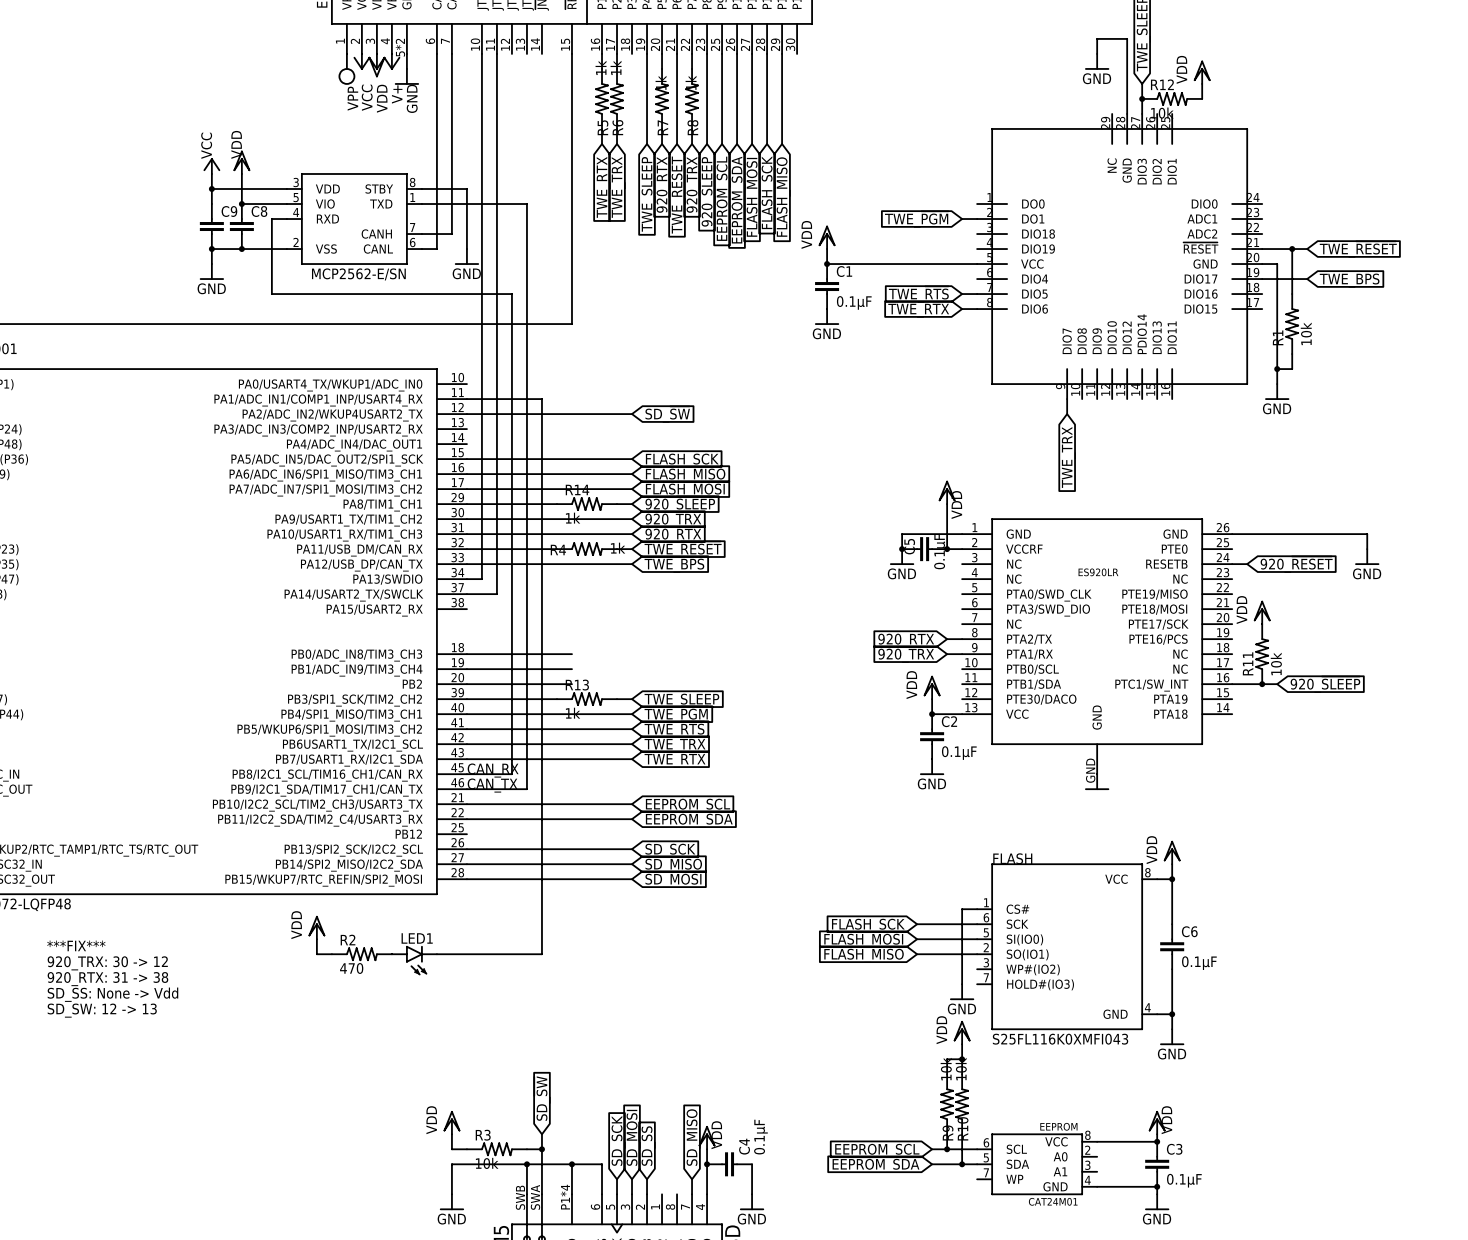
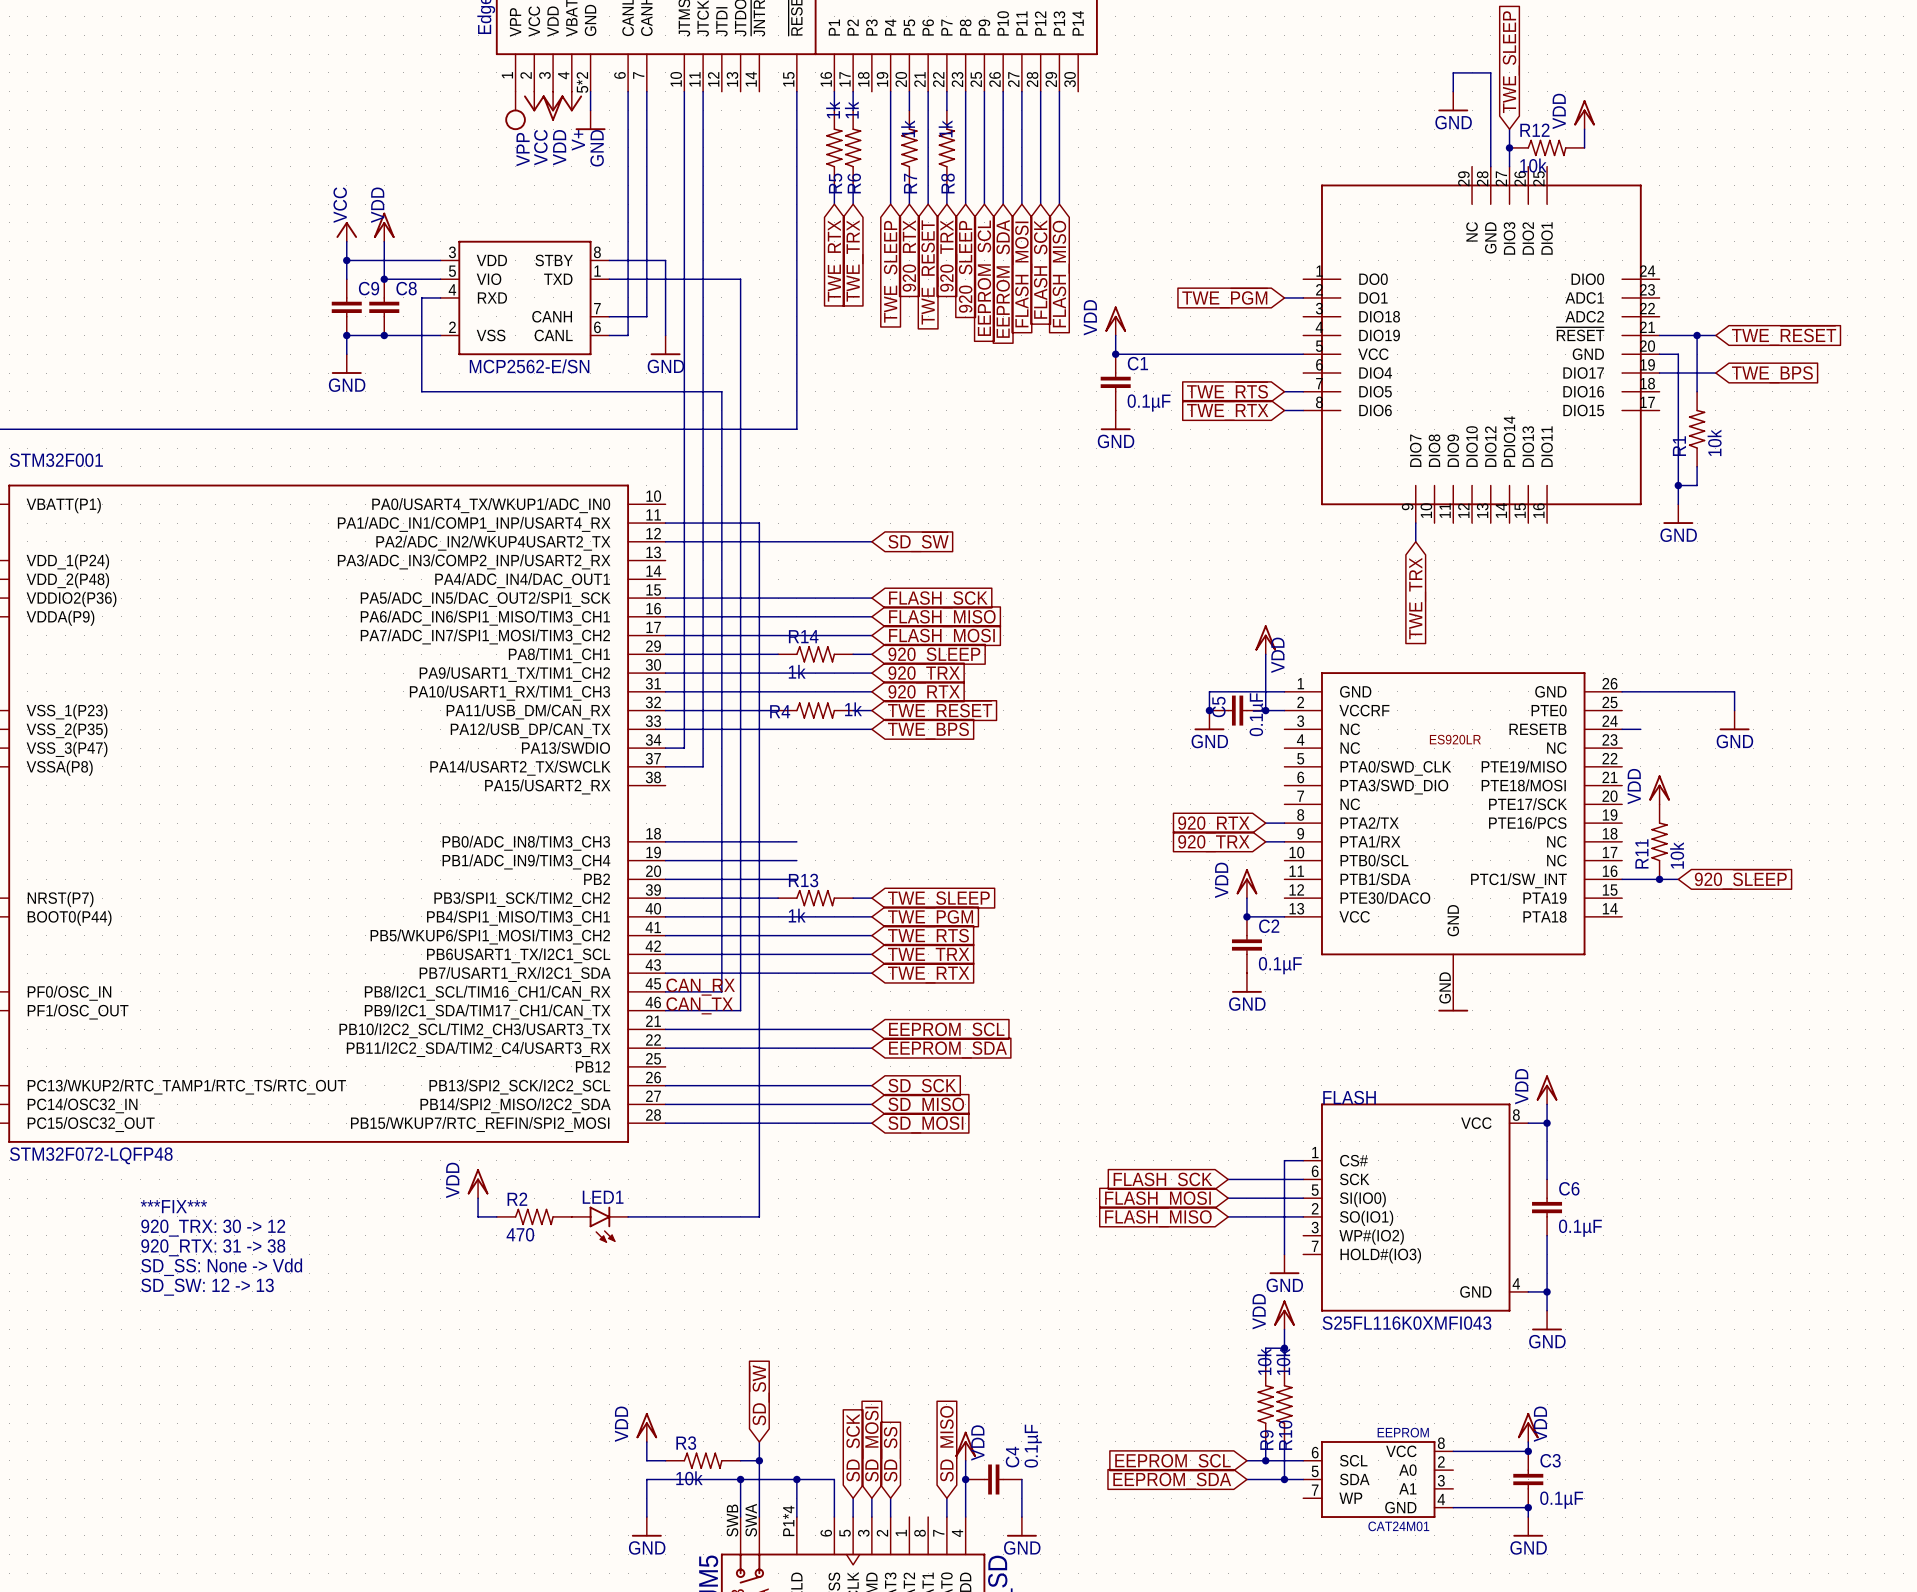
wire: (1322, 534) (1367, 534) (1367, 549) -> (1734, 691) (1734, 710)
power symbol position: GND (1367, 556) -> GND (1734, 720)
global label: 920_~{RESET} (1296, 564) -> none

